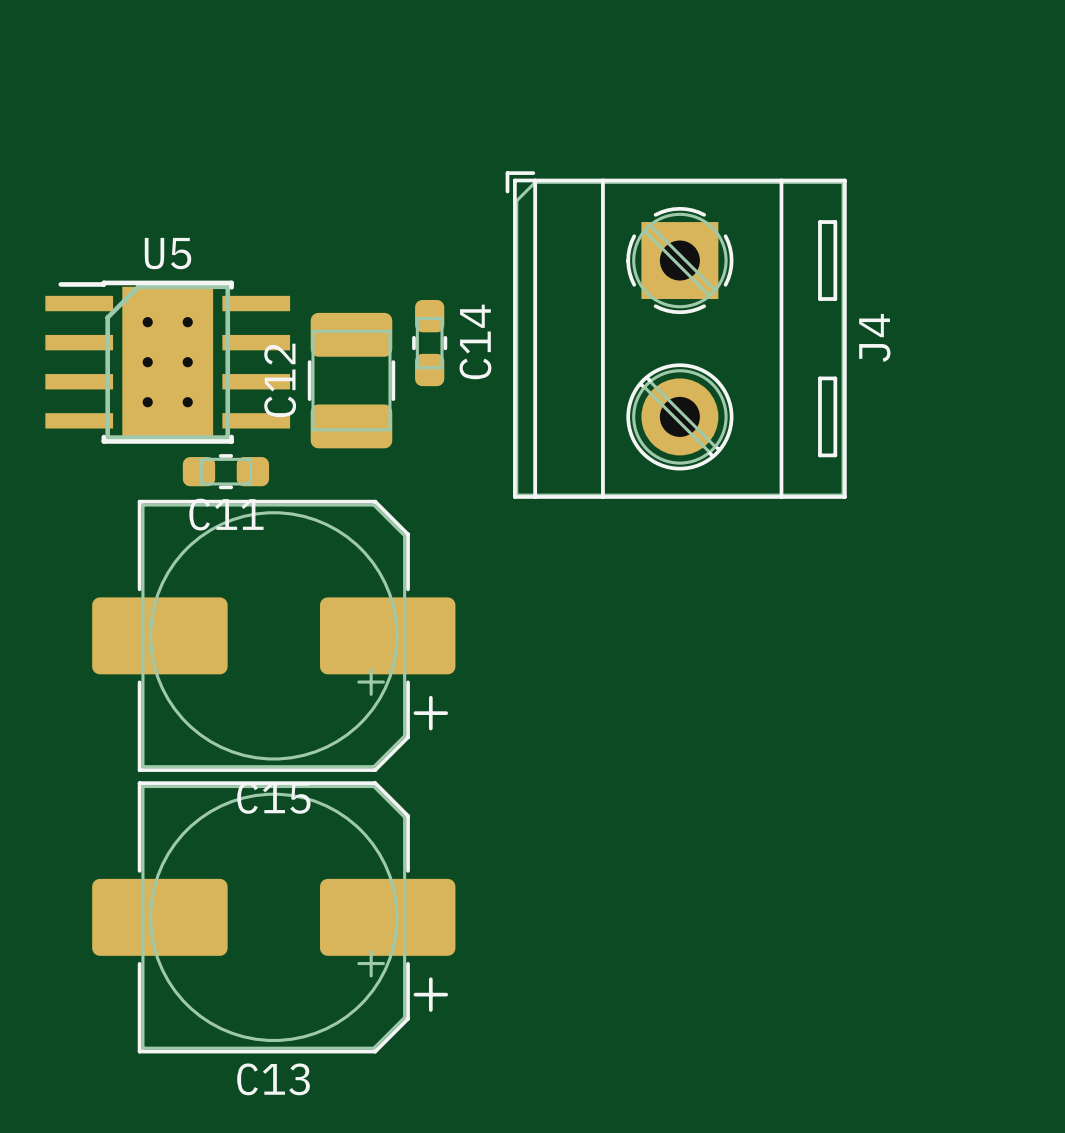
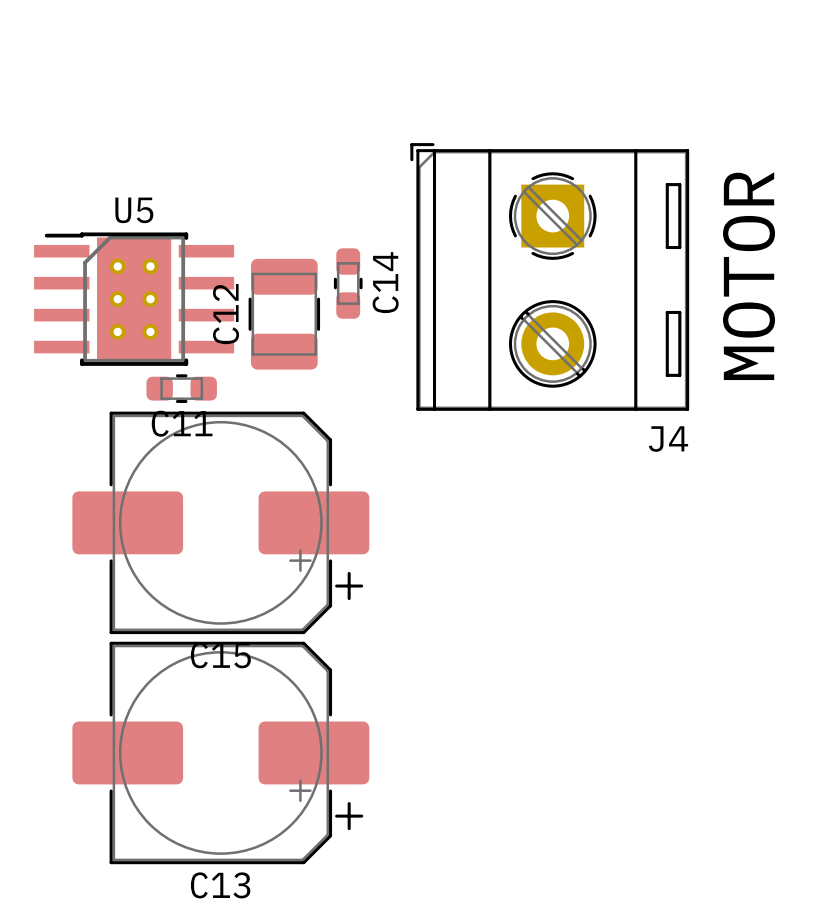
text: none -> MOTOR (749, 276)
J4 name rotation: 0° (874, 337) -> 90° clockwise (668, 439)
J4 name position: J4 (874, 337) -> J4 (668, 439)

